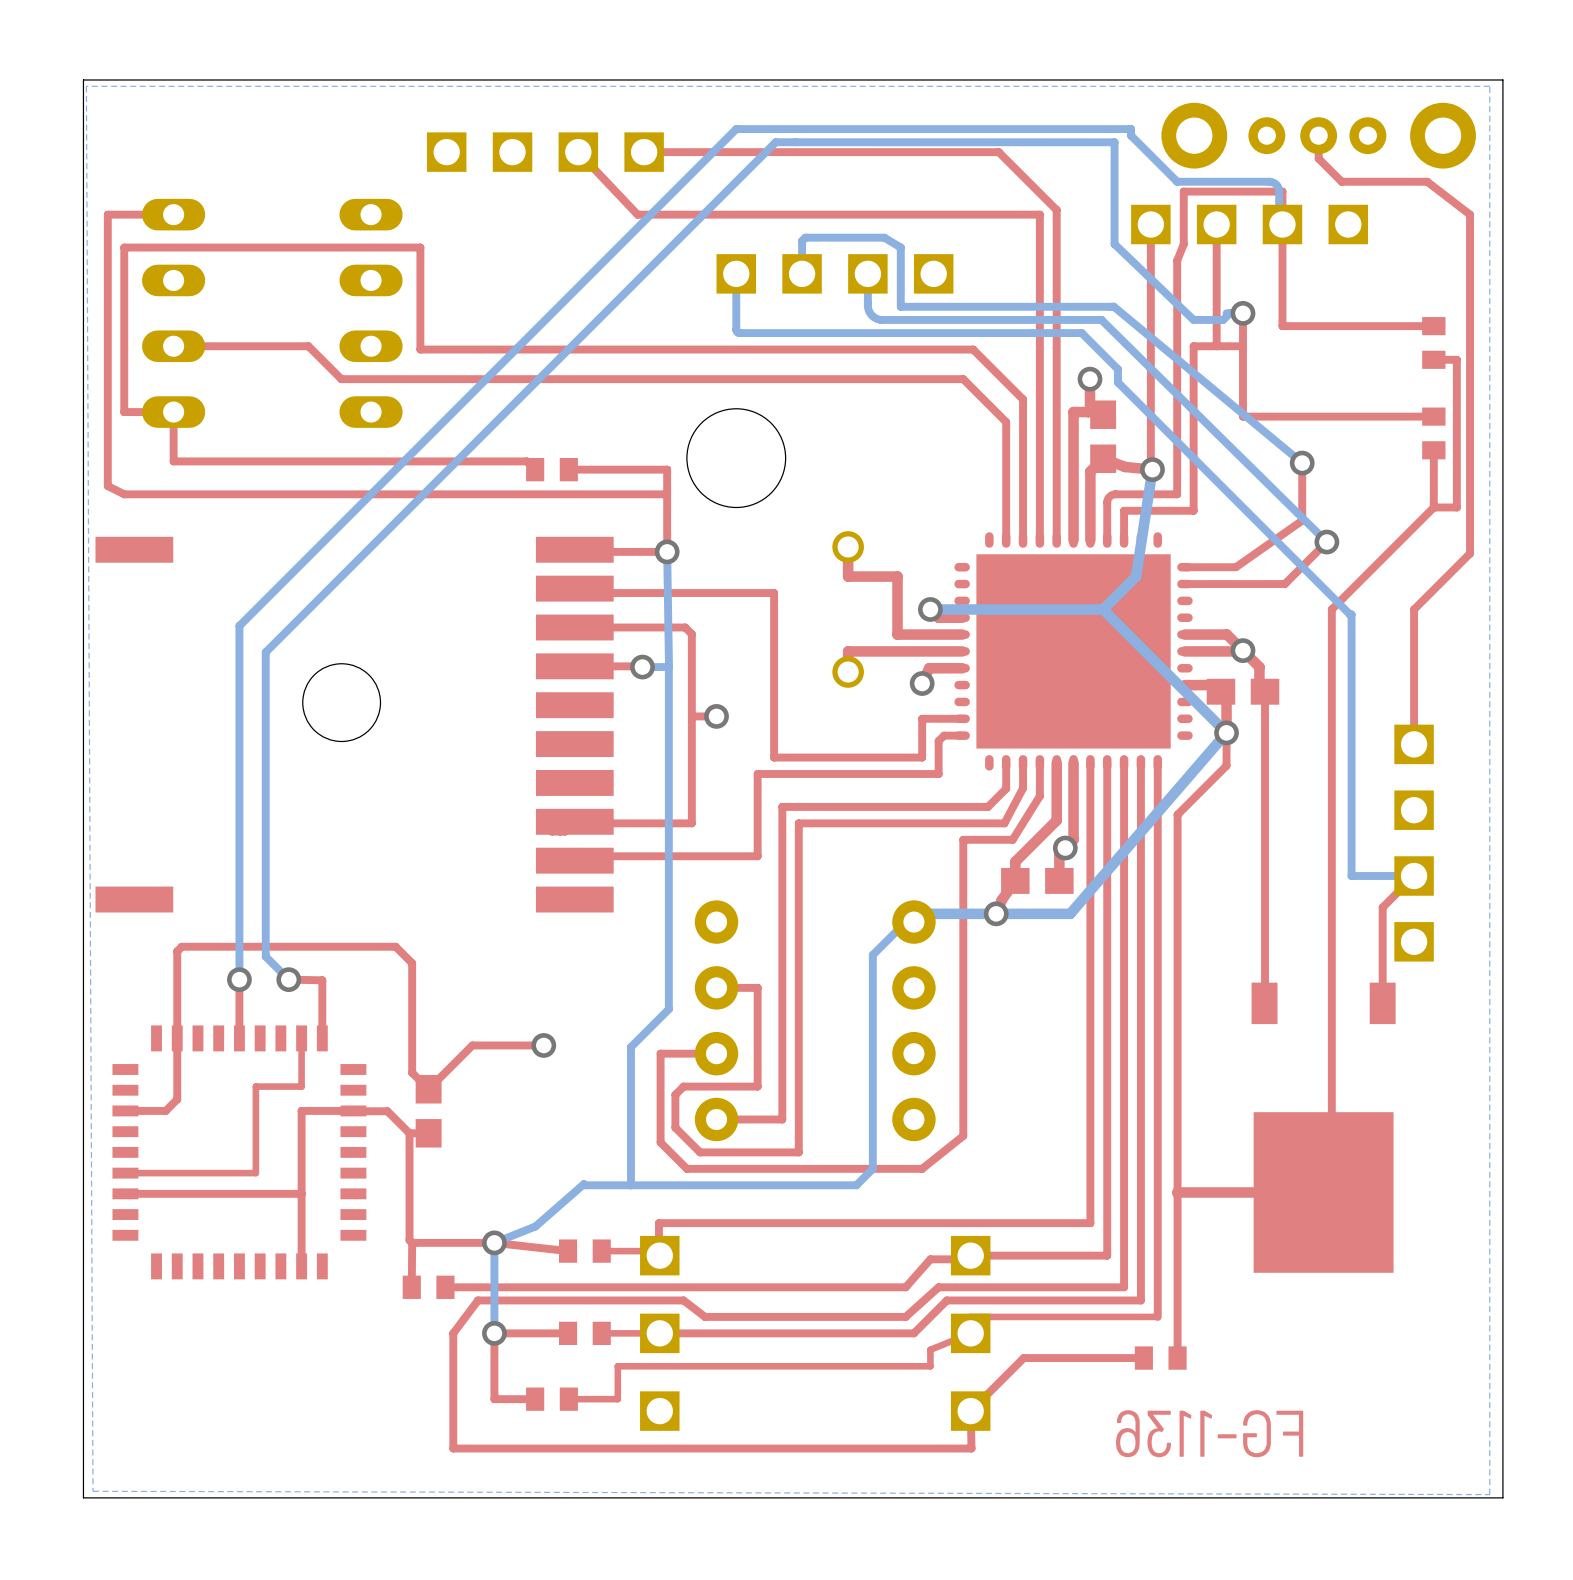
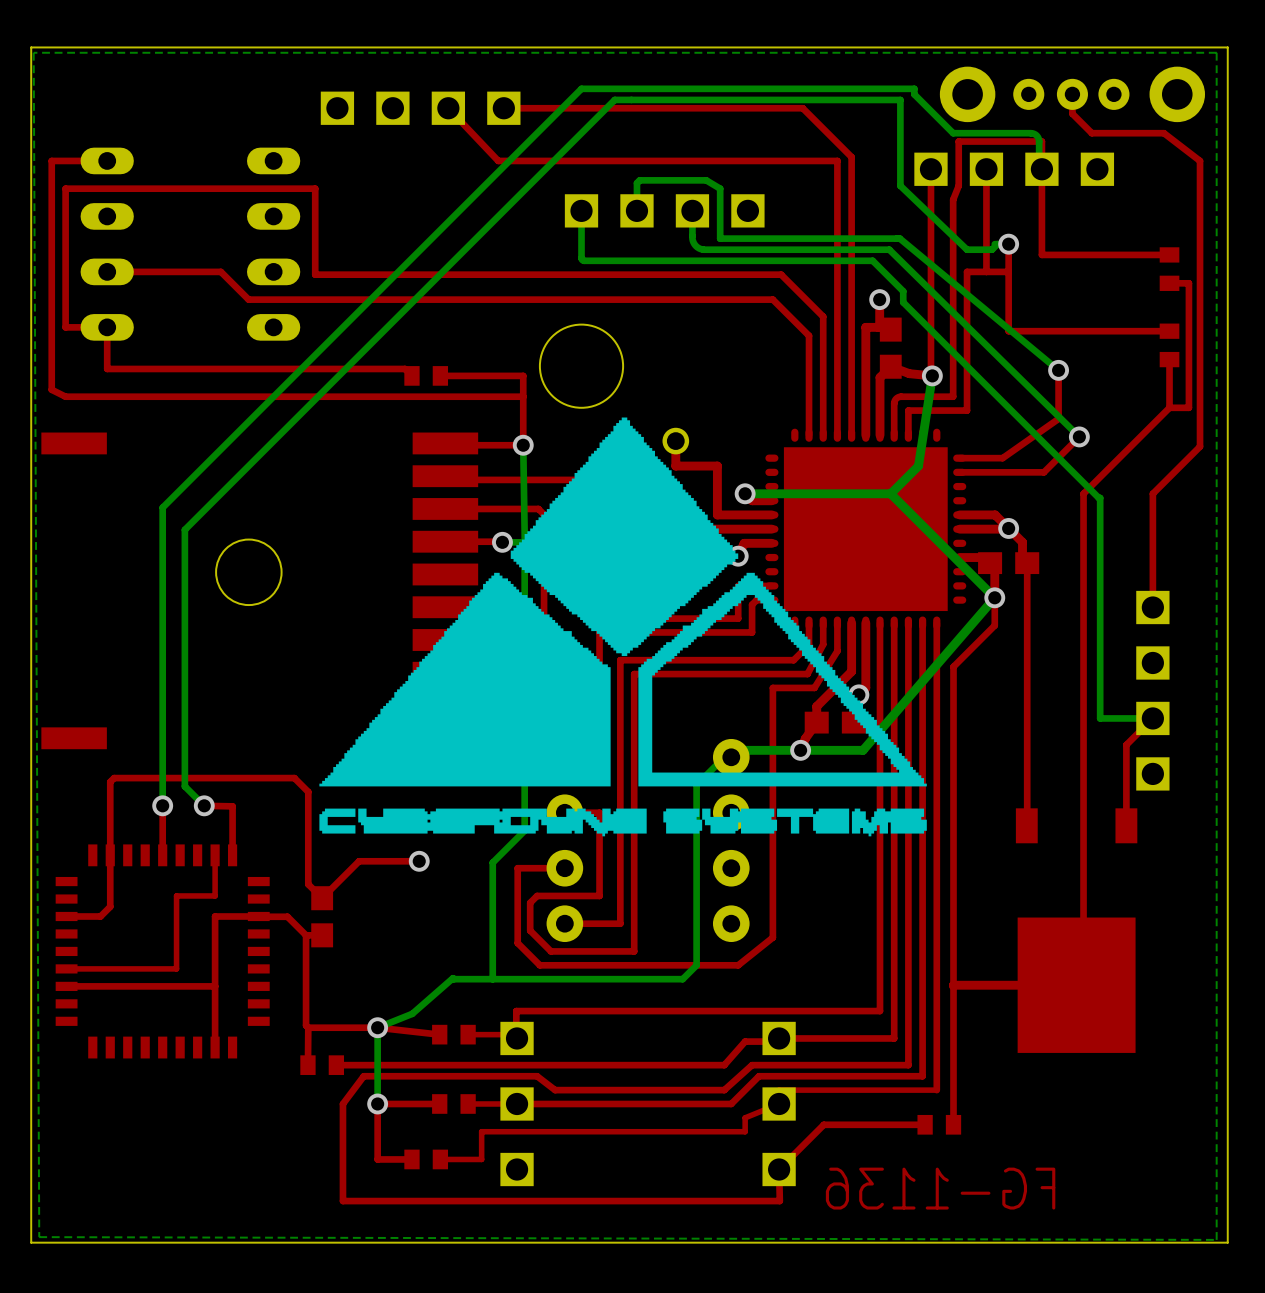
drawing: none -> [319, 417, 927, 837]

